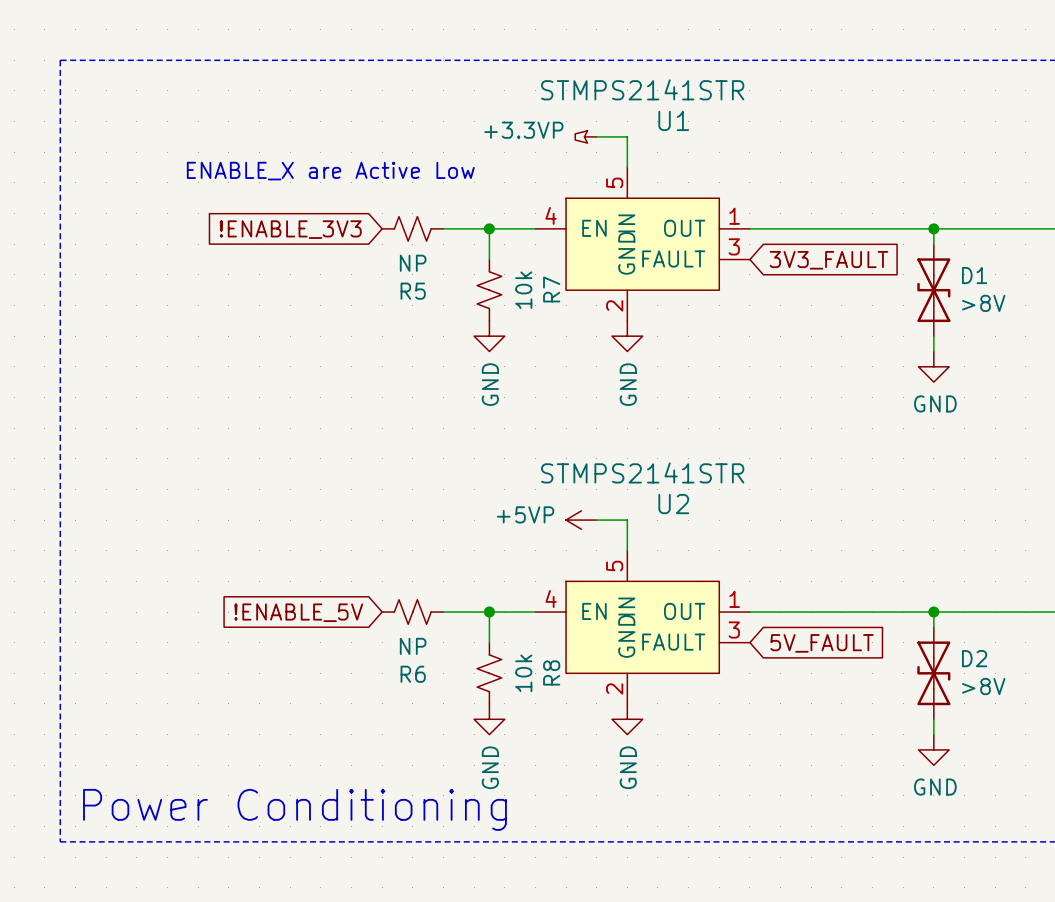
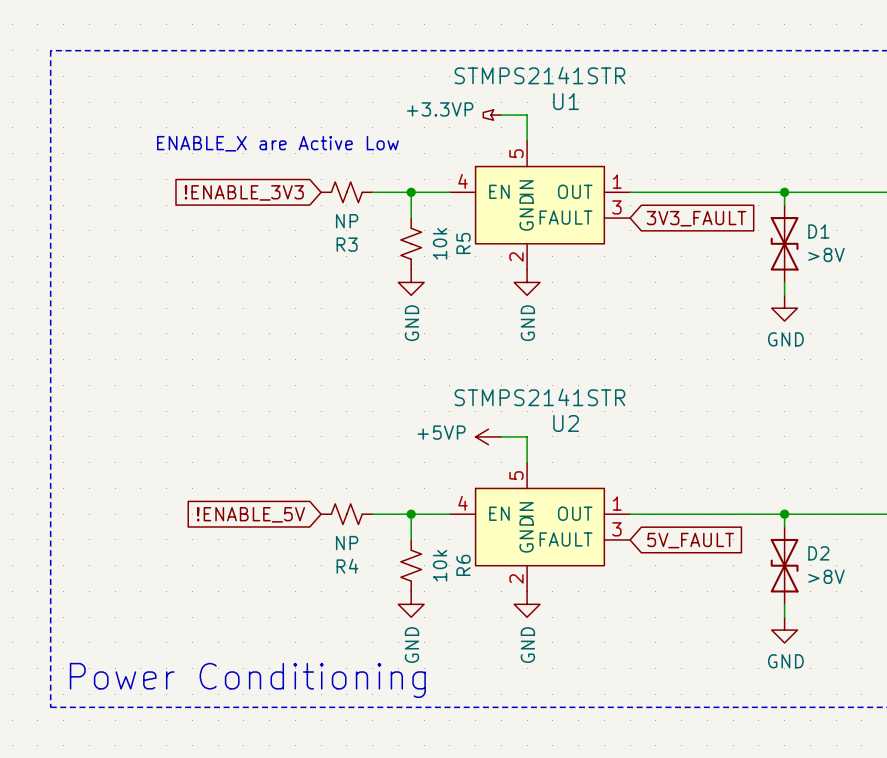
R7 name: R7 (551, 289) -> R5 (463, 243)
R5 name: R5 (413, 291) -> R3 (347, 244)
R8 name: R8 (551, 672) -> R6 (463, 565)
R6 name: R6 (413, 674) -> R4 (347, 566)

